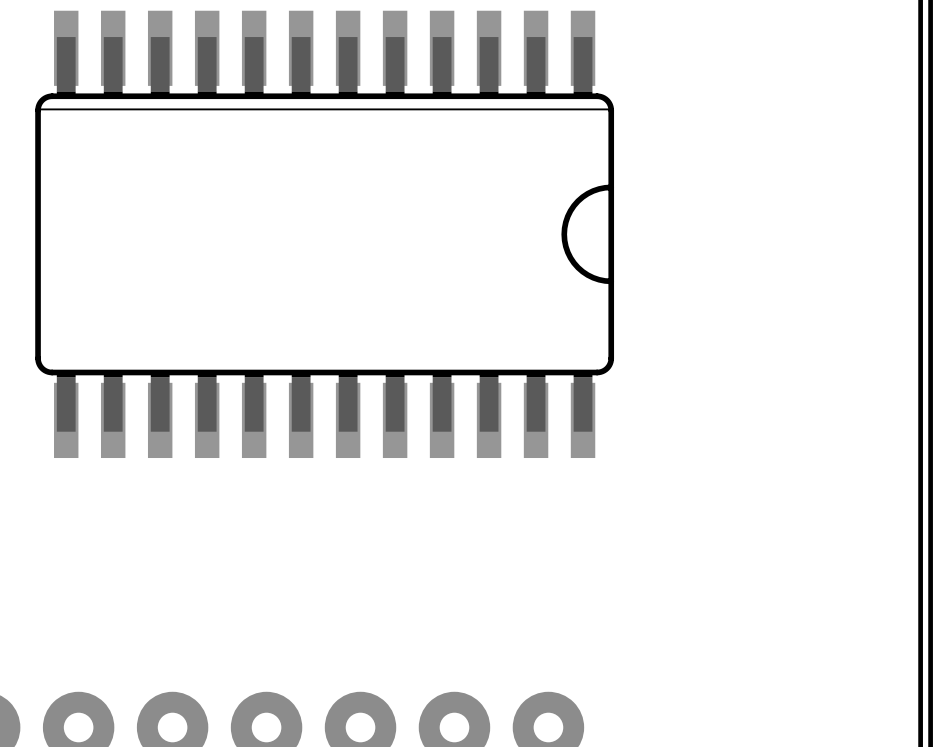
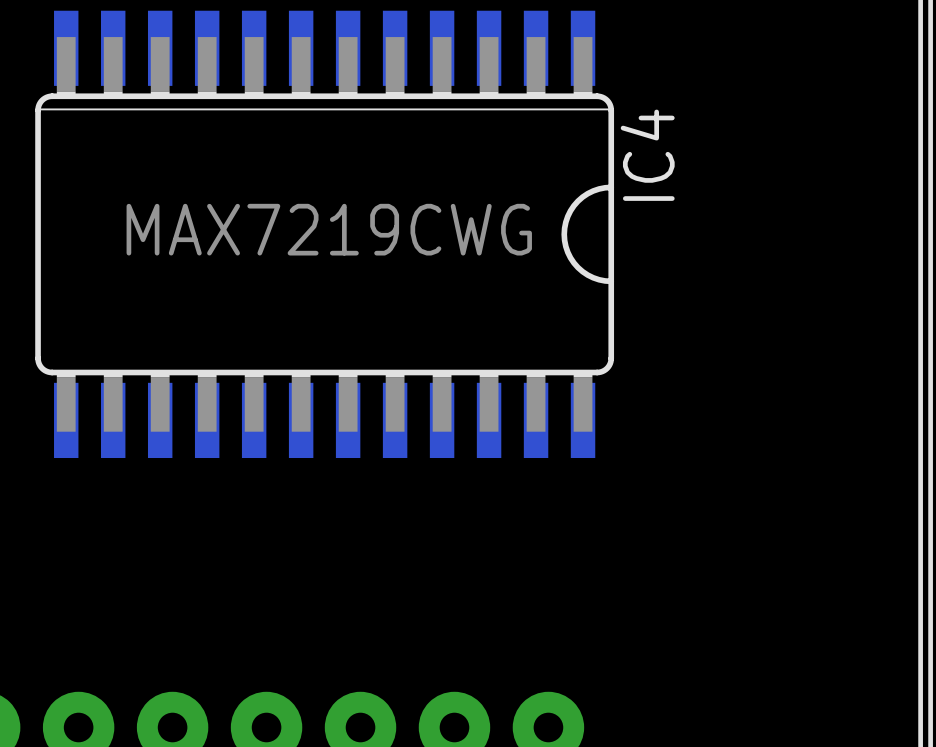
IC4 name: none -> IC4 (647, 155)
IC4 value: none -> MAX7219CWG (329, 229)

